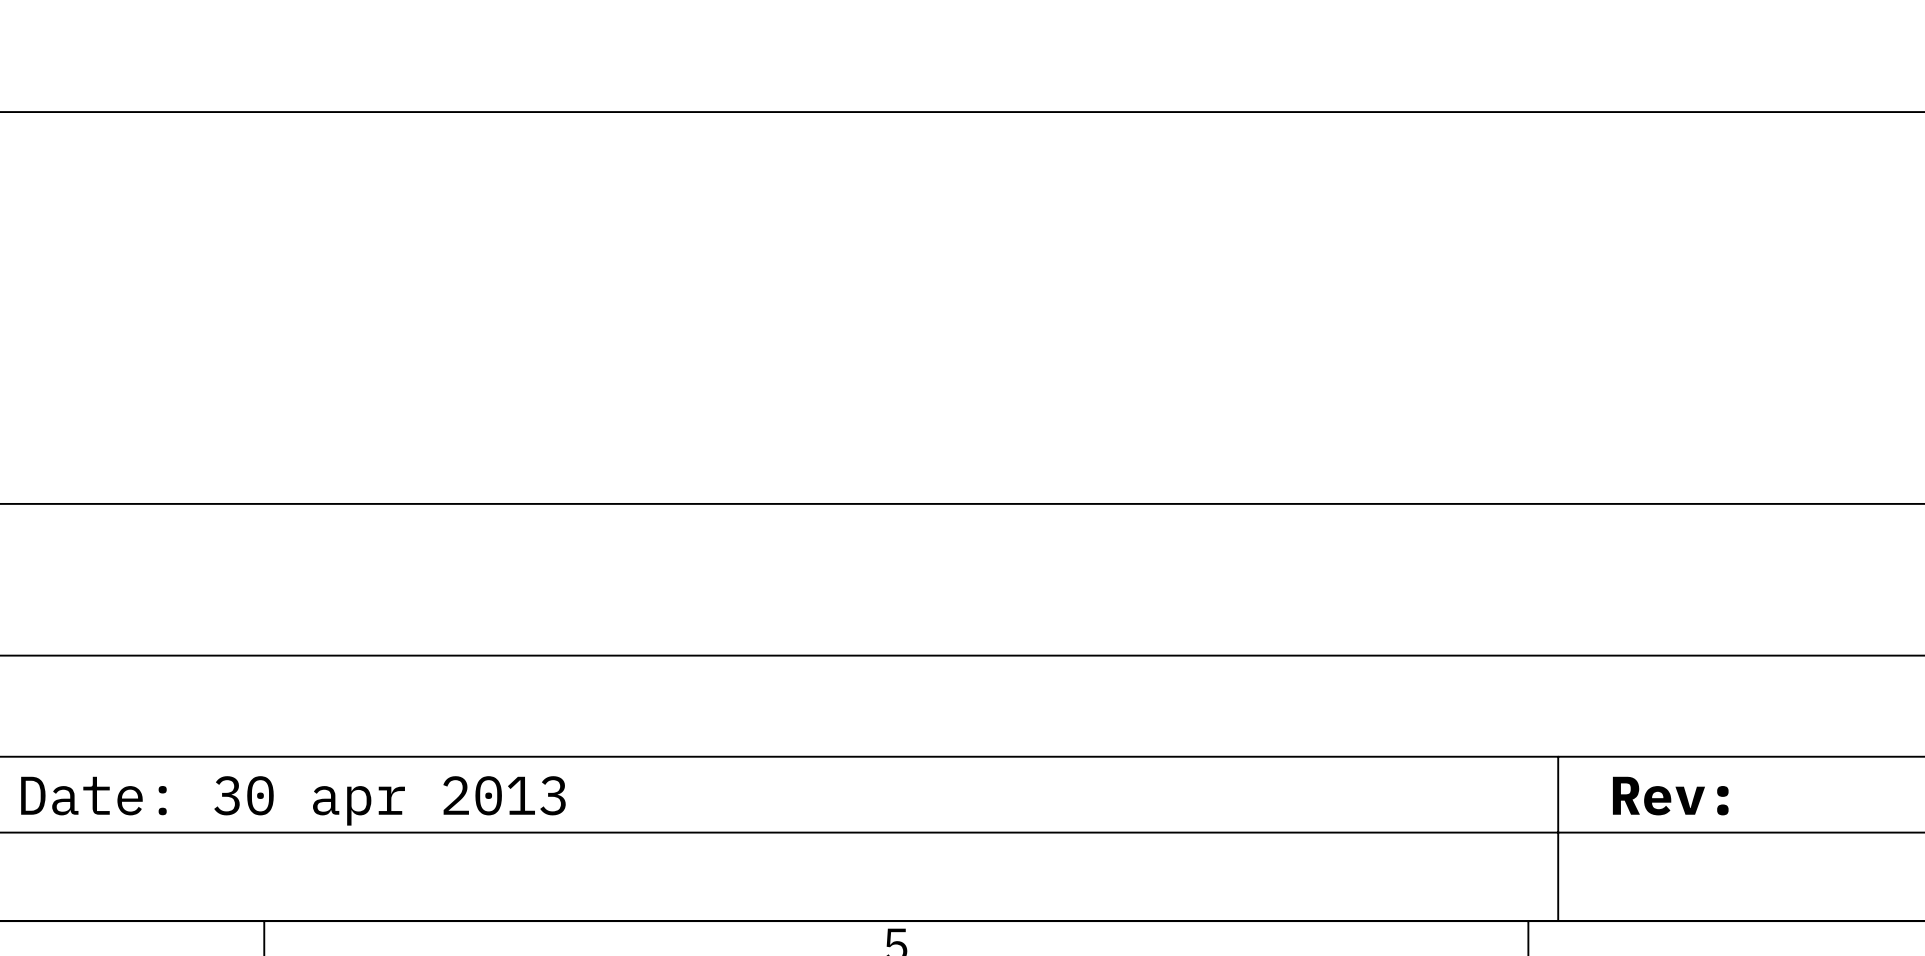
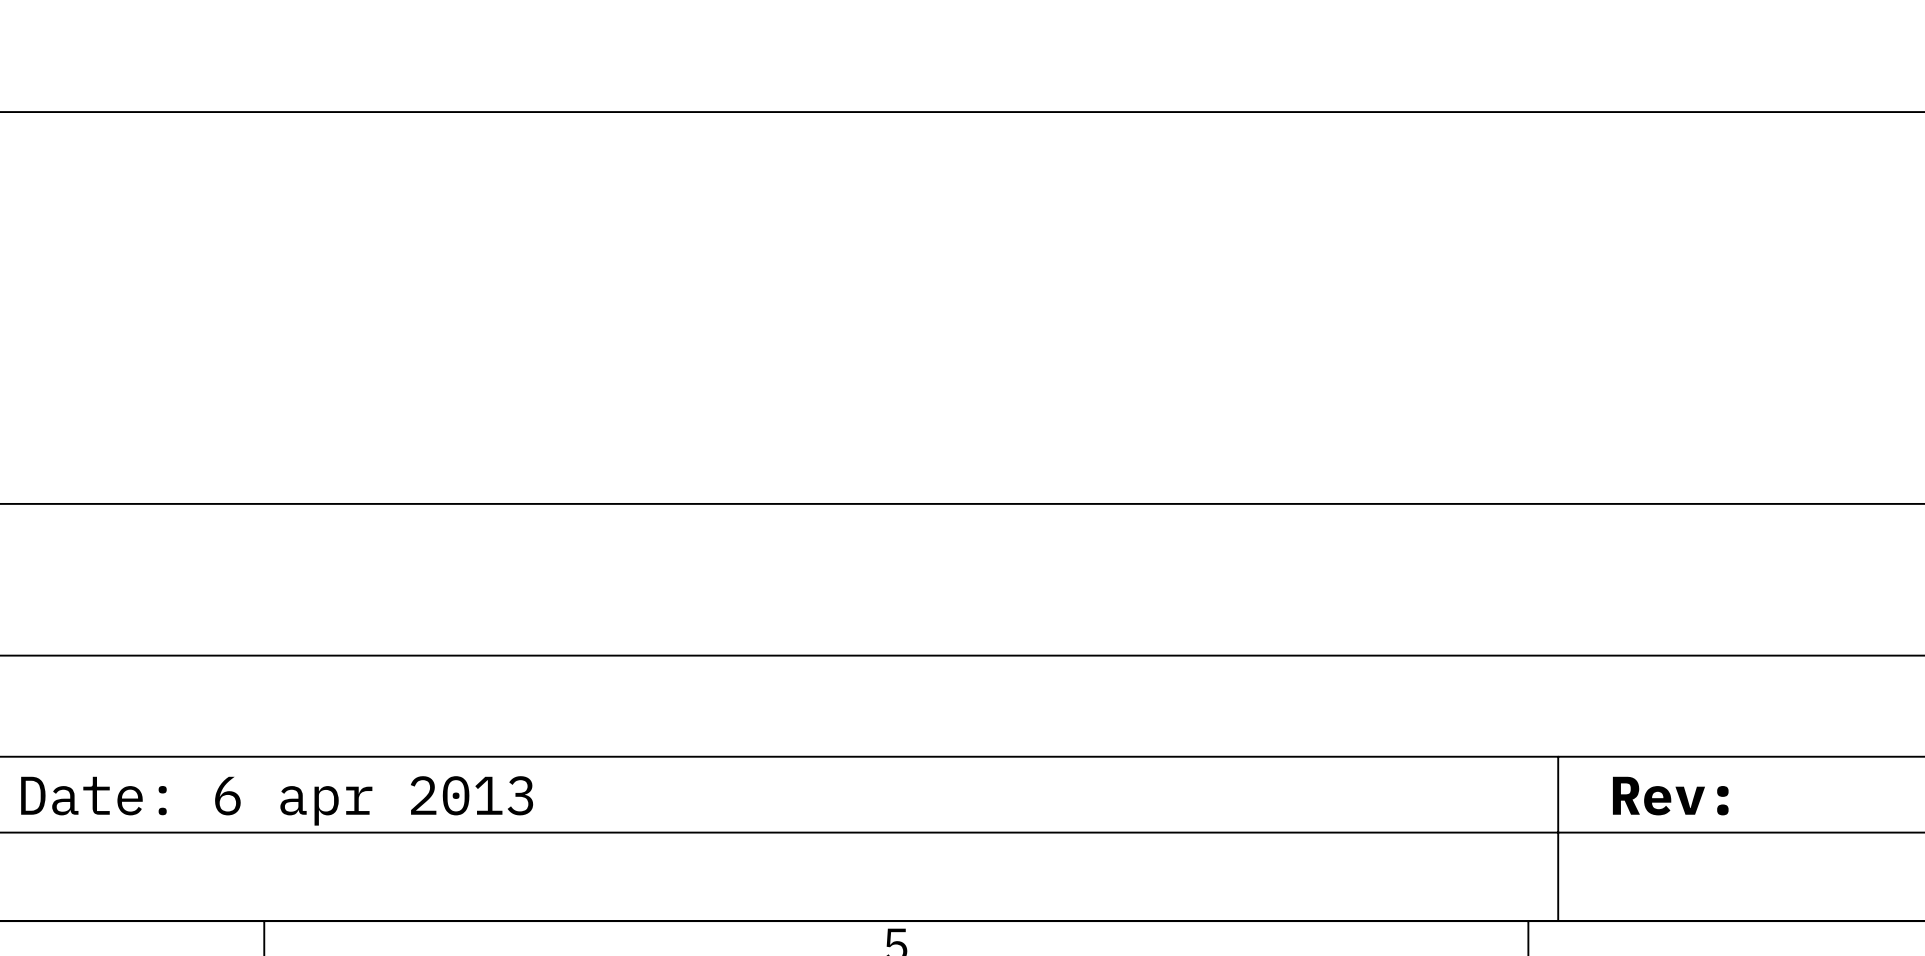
title block: Date: 30 apr 2013 (293, 800) -> Date: 6 apr 2013 (277, 800)

